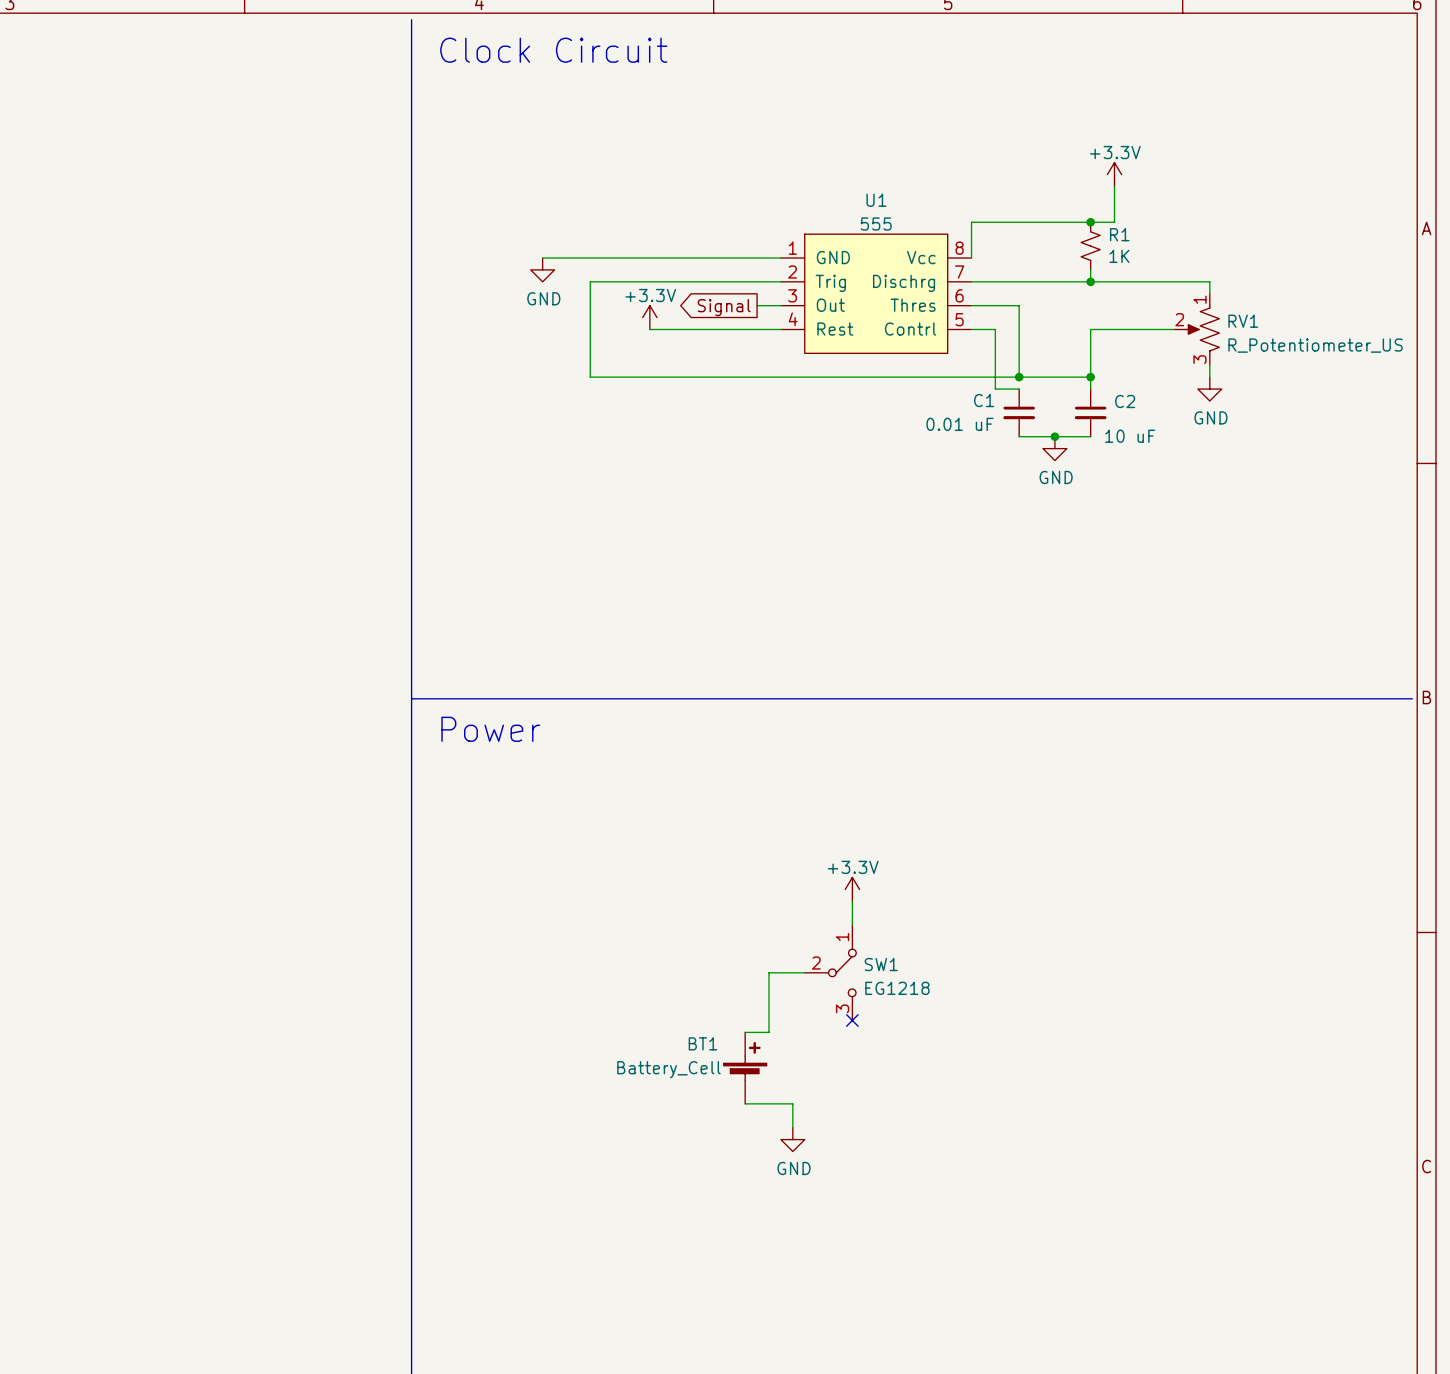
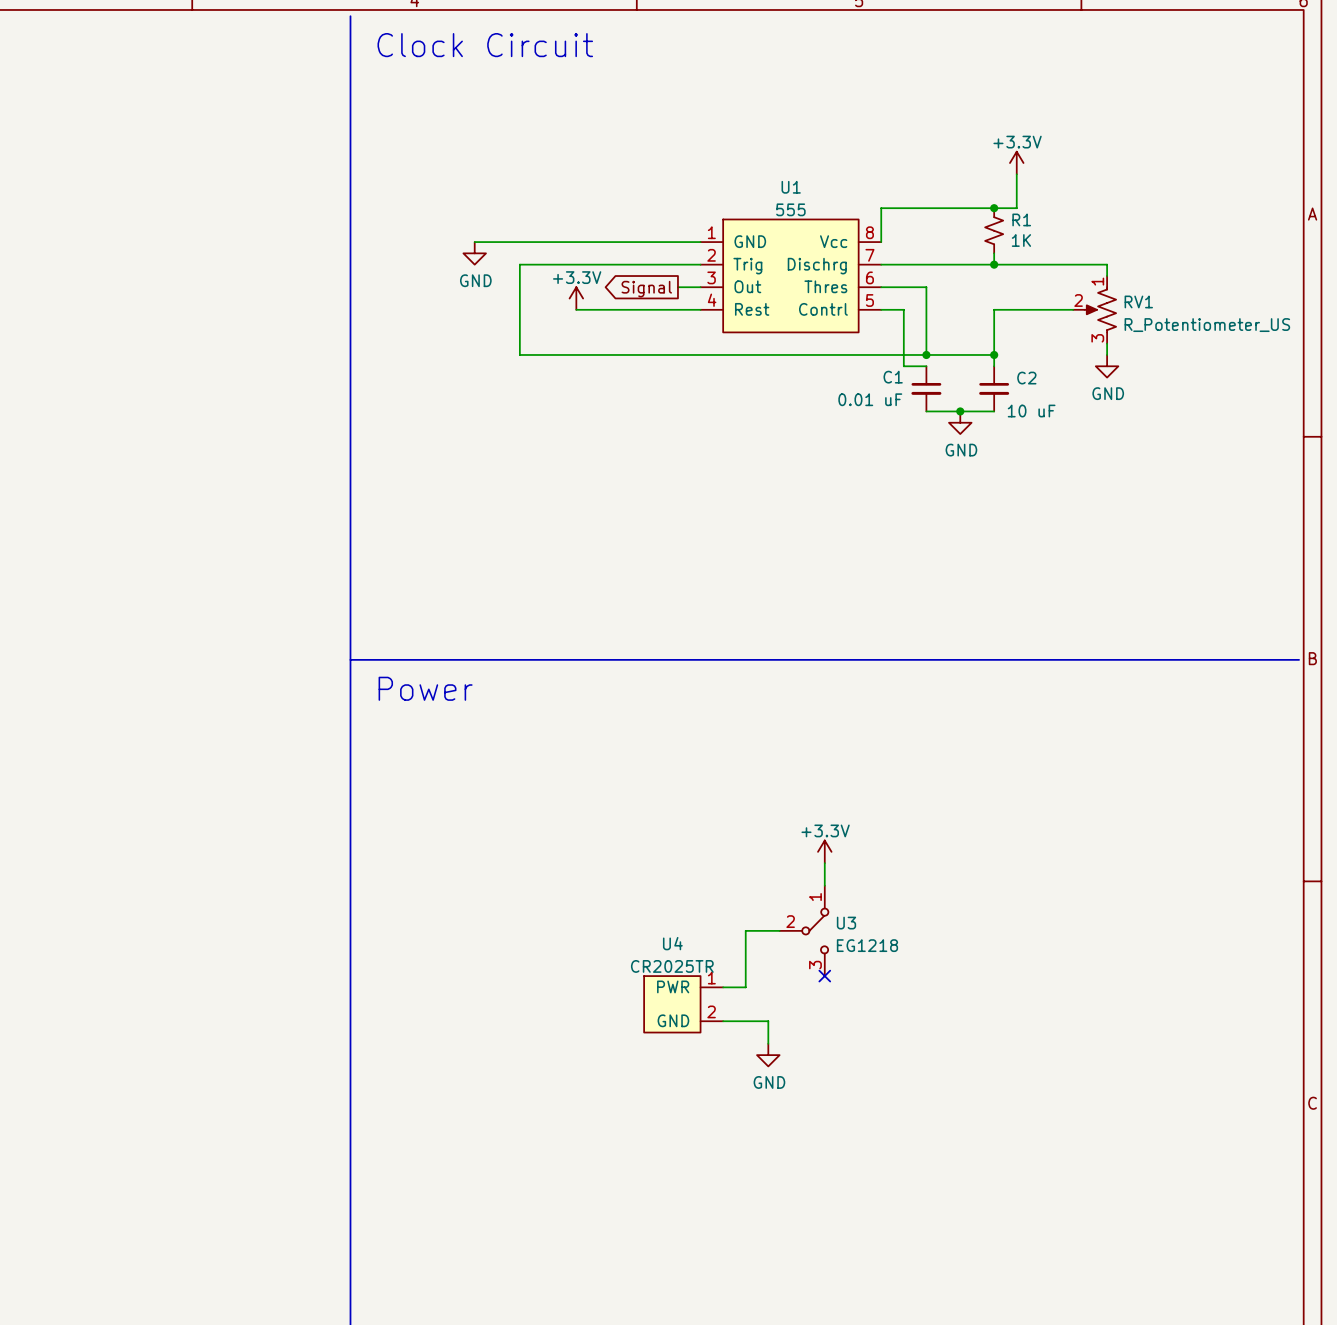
power symbol position: +3.3V (852, 889) -> +3.3V (824, 851)
wire: (852, 901) (852, 925) -> (824, 863) (824, 885)
wire: (804, 972) (769, 972) (769, 1032) (745, 1032) -> (779, 930) (745, 930) (745, 987) (723, 987)
SW1: EG1218 (830, 972) -> none
U3: none -> EG1218 (804, 930)
no-connect mark: (852, 1020) -> none
no-connect mark: none -> (824, 976)
U4: none -> CR2025TR (683, 1004)
BT1: Battery_Cell (745, 1068) -> none
wire: (745, 1103) (792, 1103) (792, 1127) -> (723, 1021) (768, 1021) (768, 1043)
power symbol position: GND (792, 1139) -> GND (768, 1055)

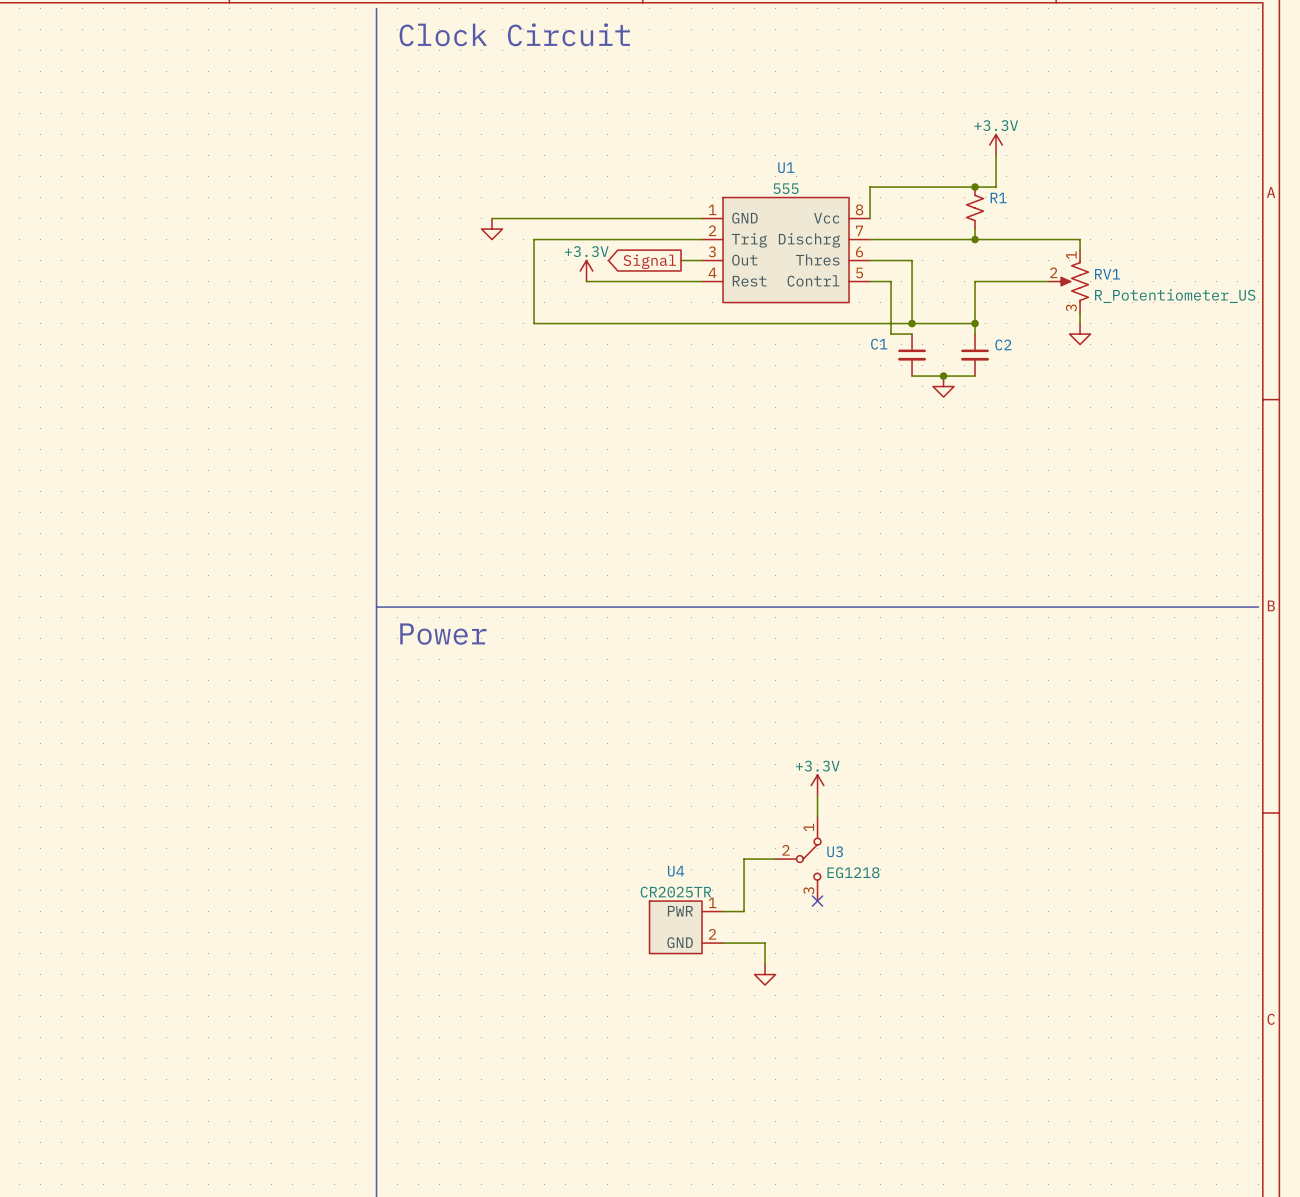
R1 value: 1K (1021, 240) -> none
power symbol text: GND (475, 280) -> none
power symbol text: GND (1108, 393) -> none
C1 value: 0.01 uF (870, 399) -> none
C2 value: 10 uF (1031, 411) -> none
power symbol text: GND (961, 450) -> none
power symbol text: GND (769, 1082) -> none

